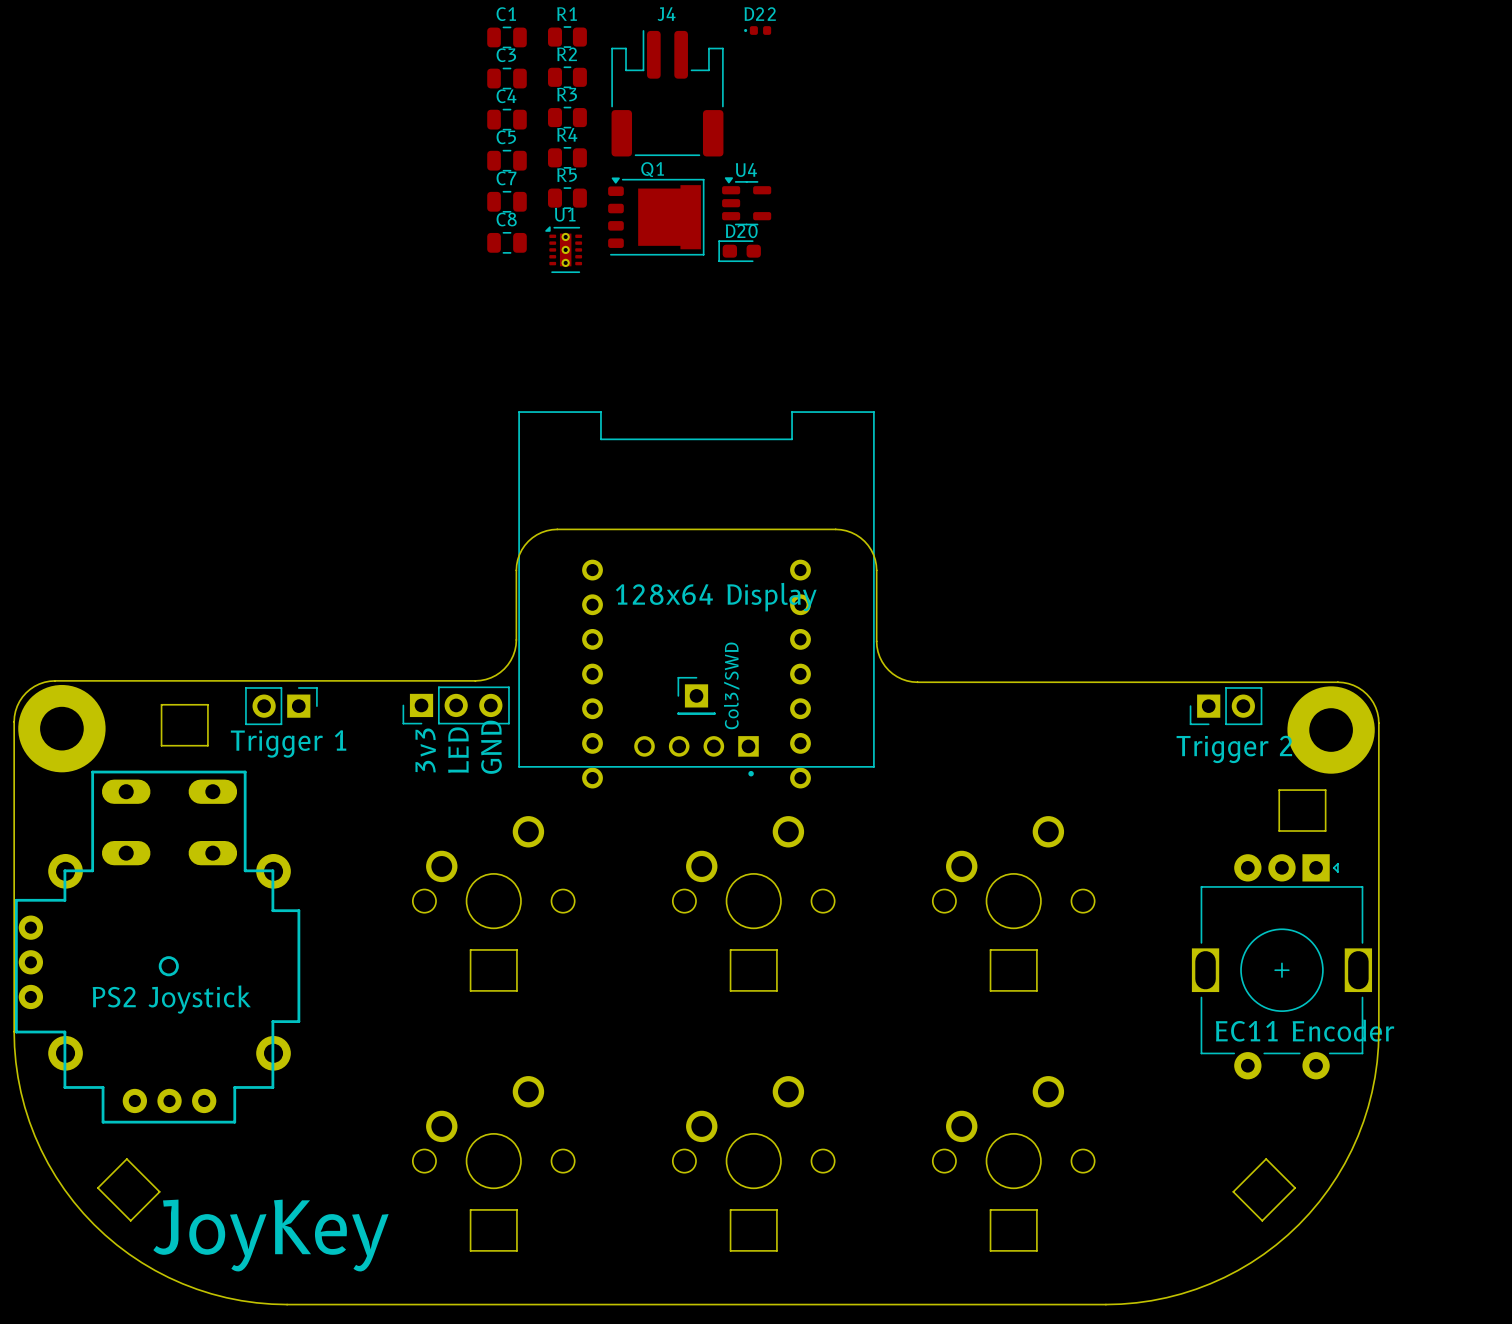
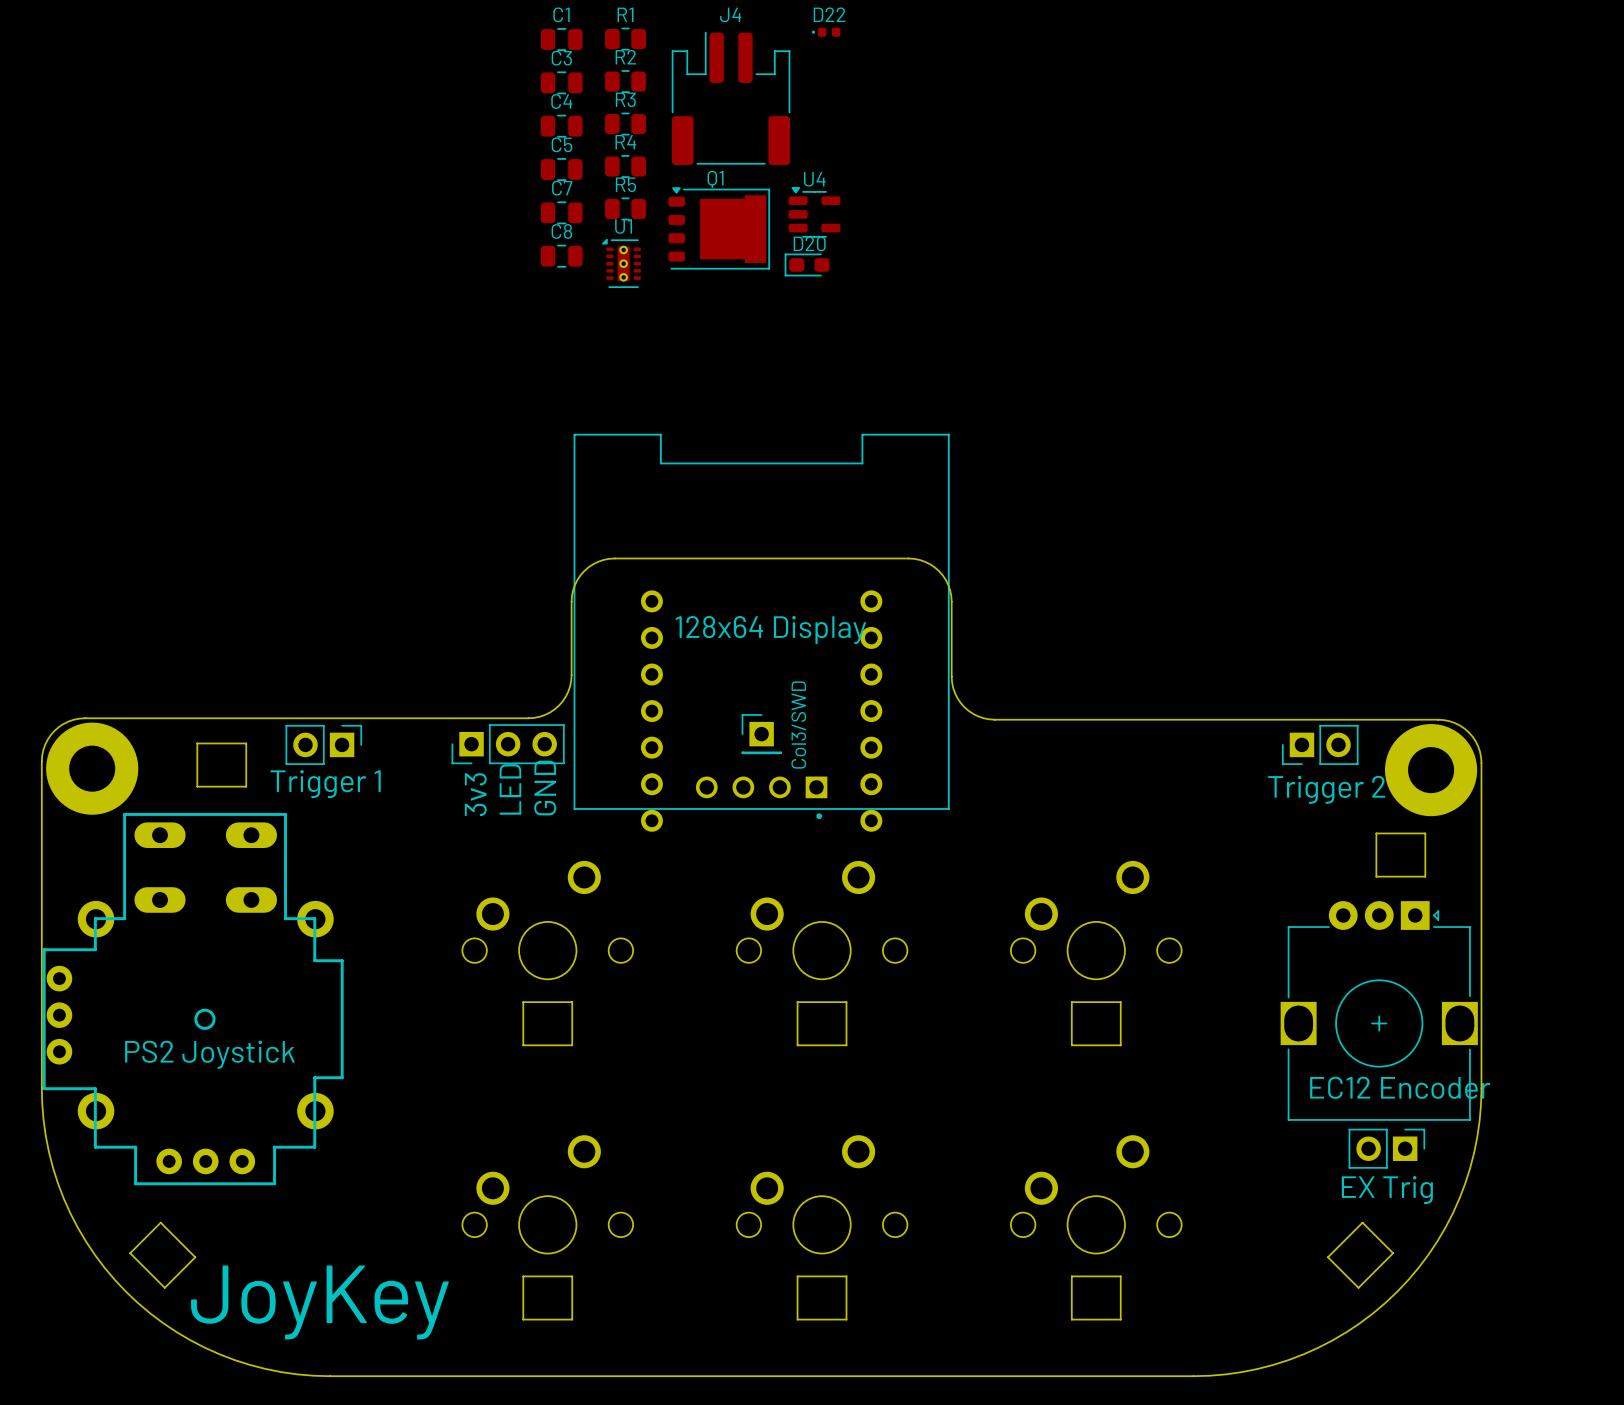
part footprint: [1191, 854, 1373, 1080] -> [1280, 901, 1478, 1121]
text: EC11 Encoder (1305, 1030) -> EC12 Encoder (1400, 1087)
part: none -> (1386, 1148)
text: none -> EX Trig (1387, 1190)

